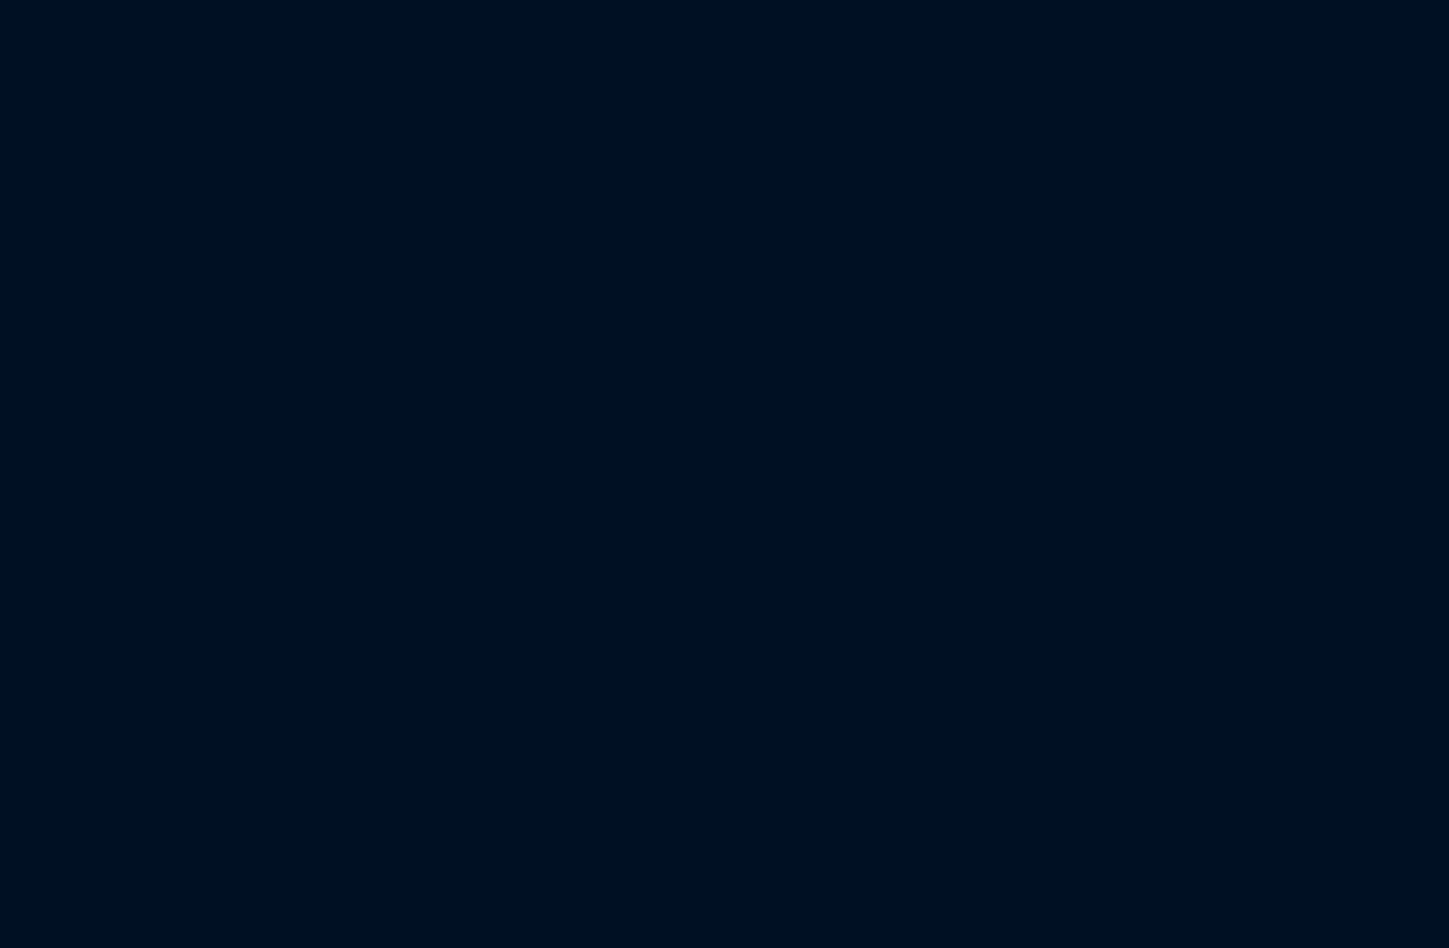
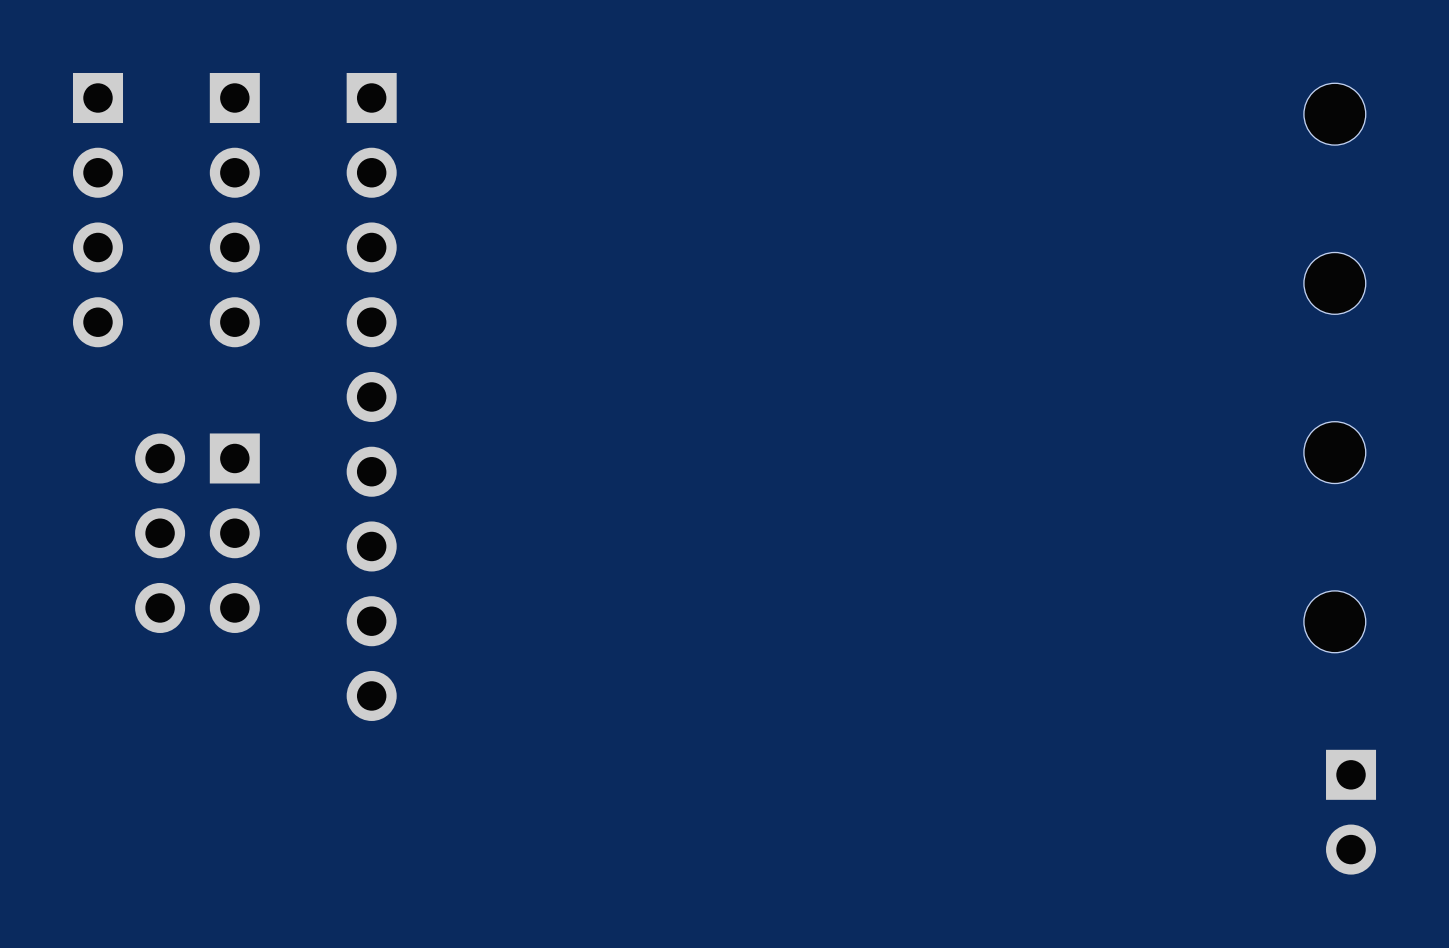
part: none -> (1334, 114)
part: none -> (98, 210)
part: none -> (234, 210)
part: none -> (1334, 283)
part: none -> (371, 396)
part: none -> (1334, 452)
part: none -> (197, 533)
part: none -> (1334, 621)
part: none -> (1351, 812)

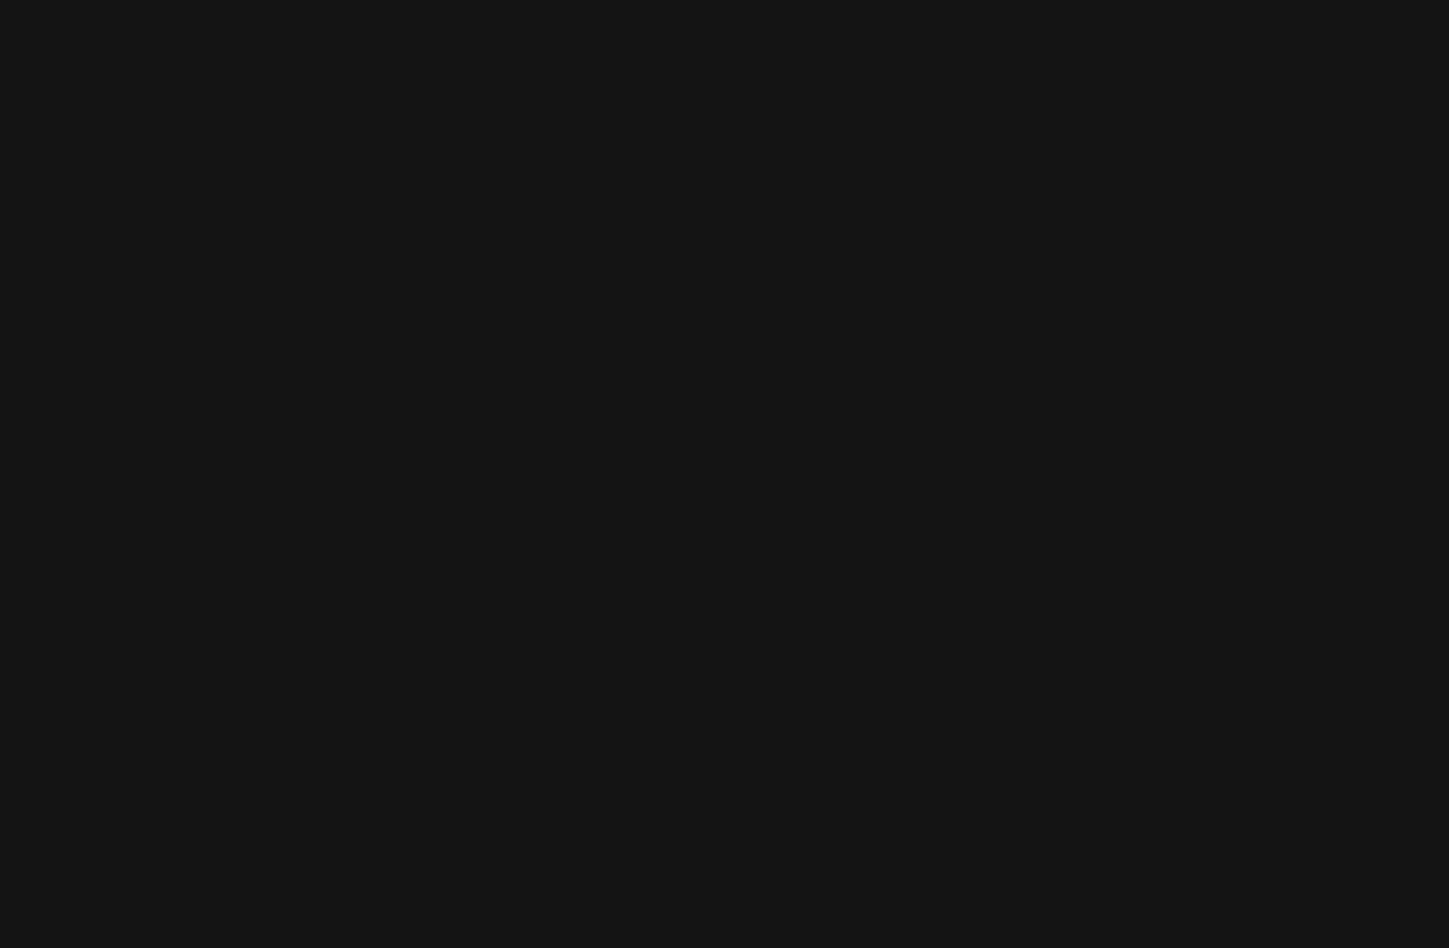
part: (1334, 114) -> none
part: (98, 210) -> none
part: (234, 210) -> none
part: (1334, 283) -> none
part: (371, 396) -> none
part: (1334, 452) -> none
part: (197, 533) -> none
part: (1334, 621) -> none
part: (1351, 812) -> none

